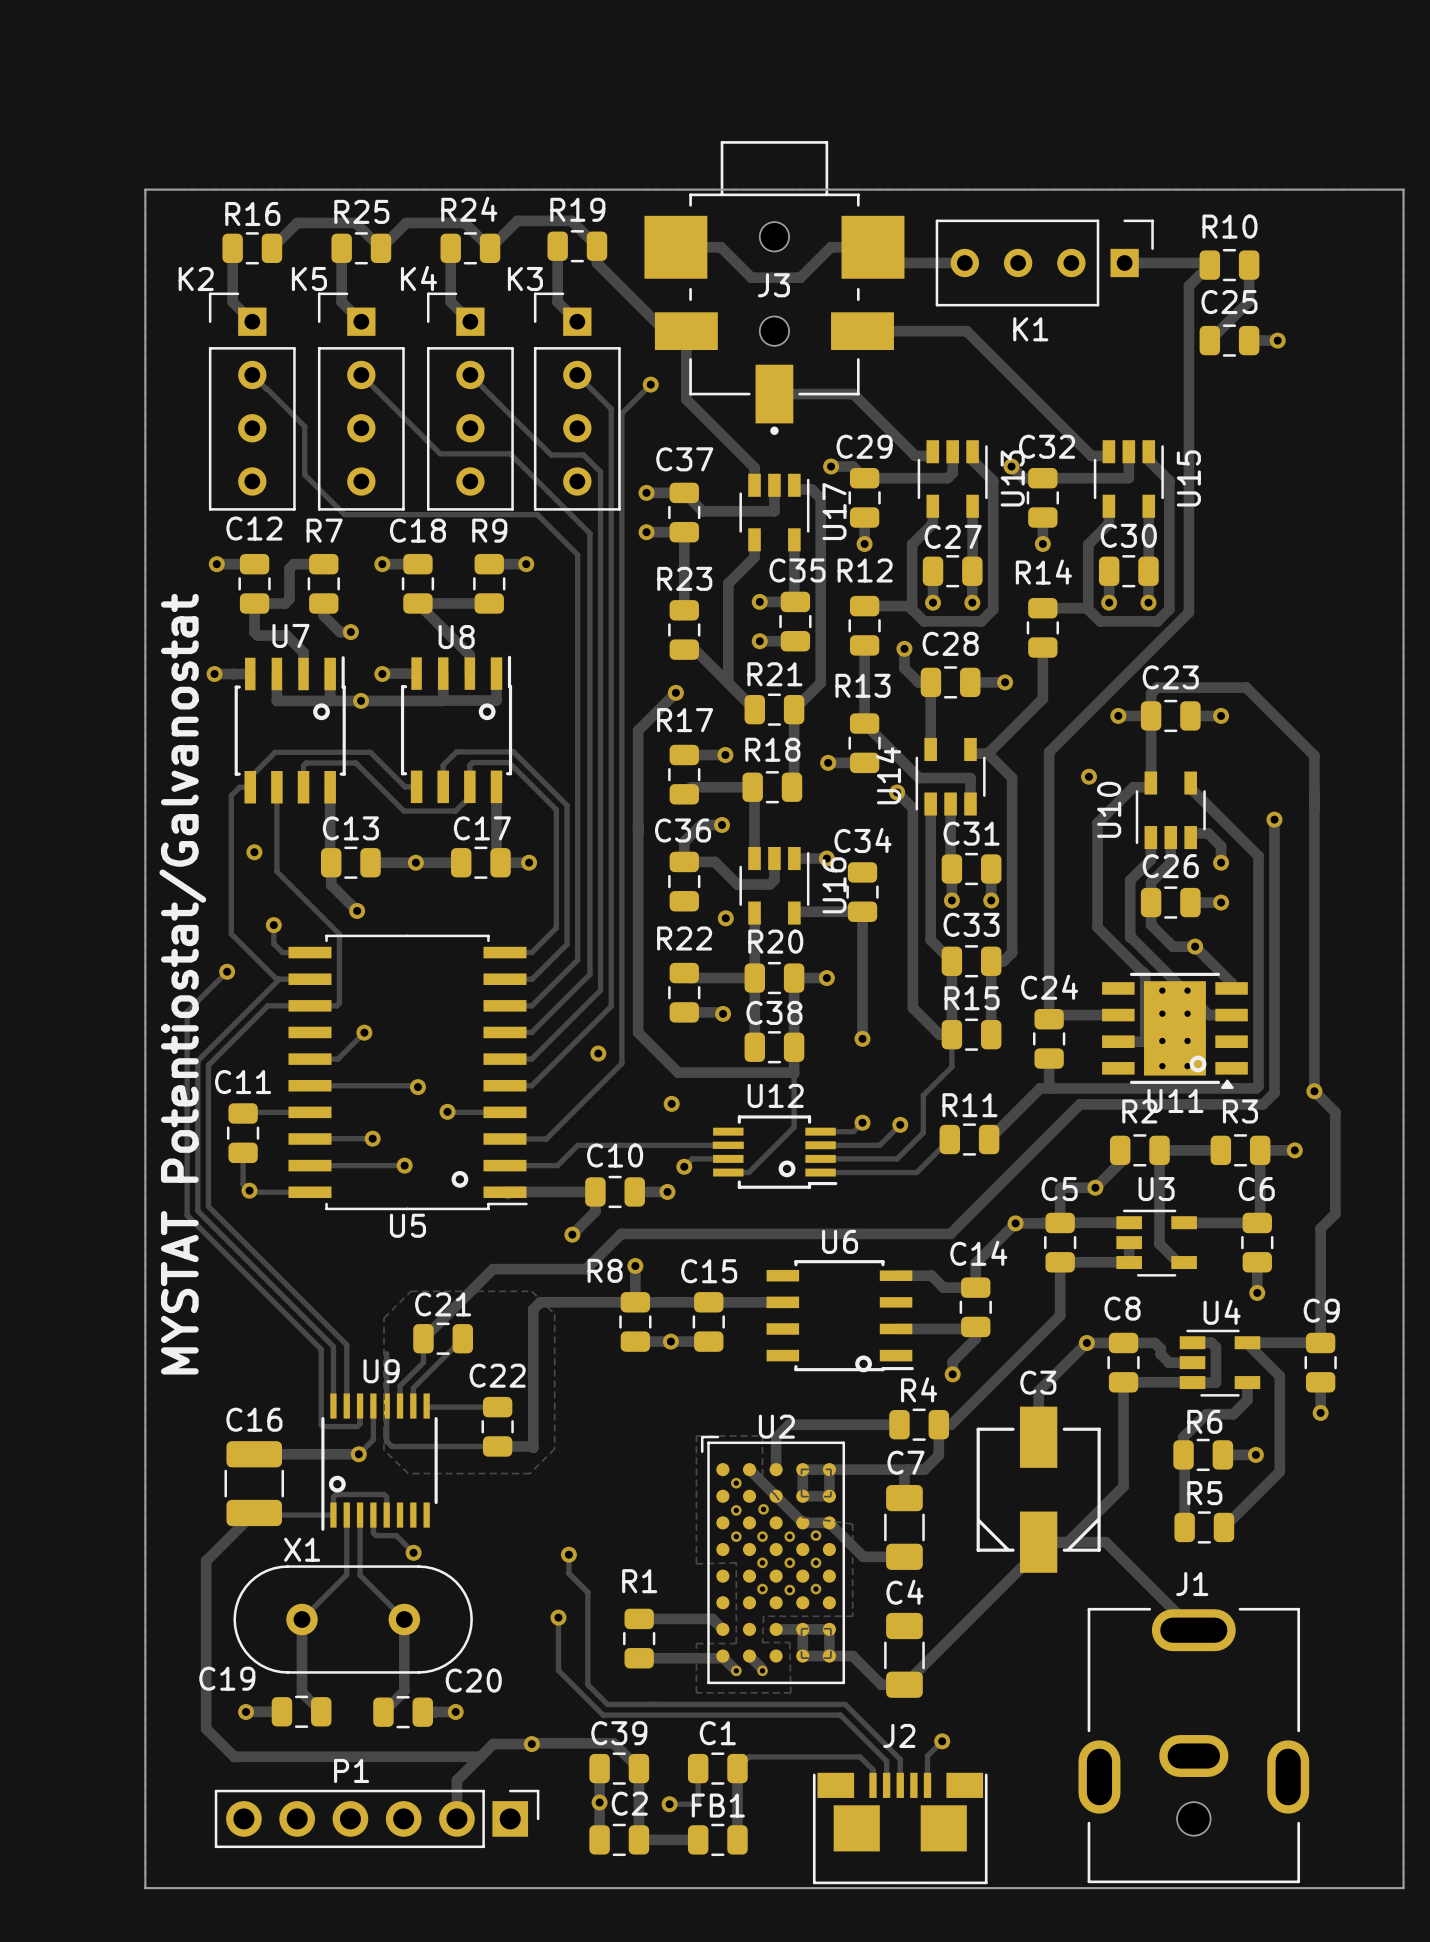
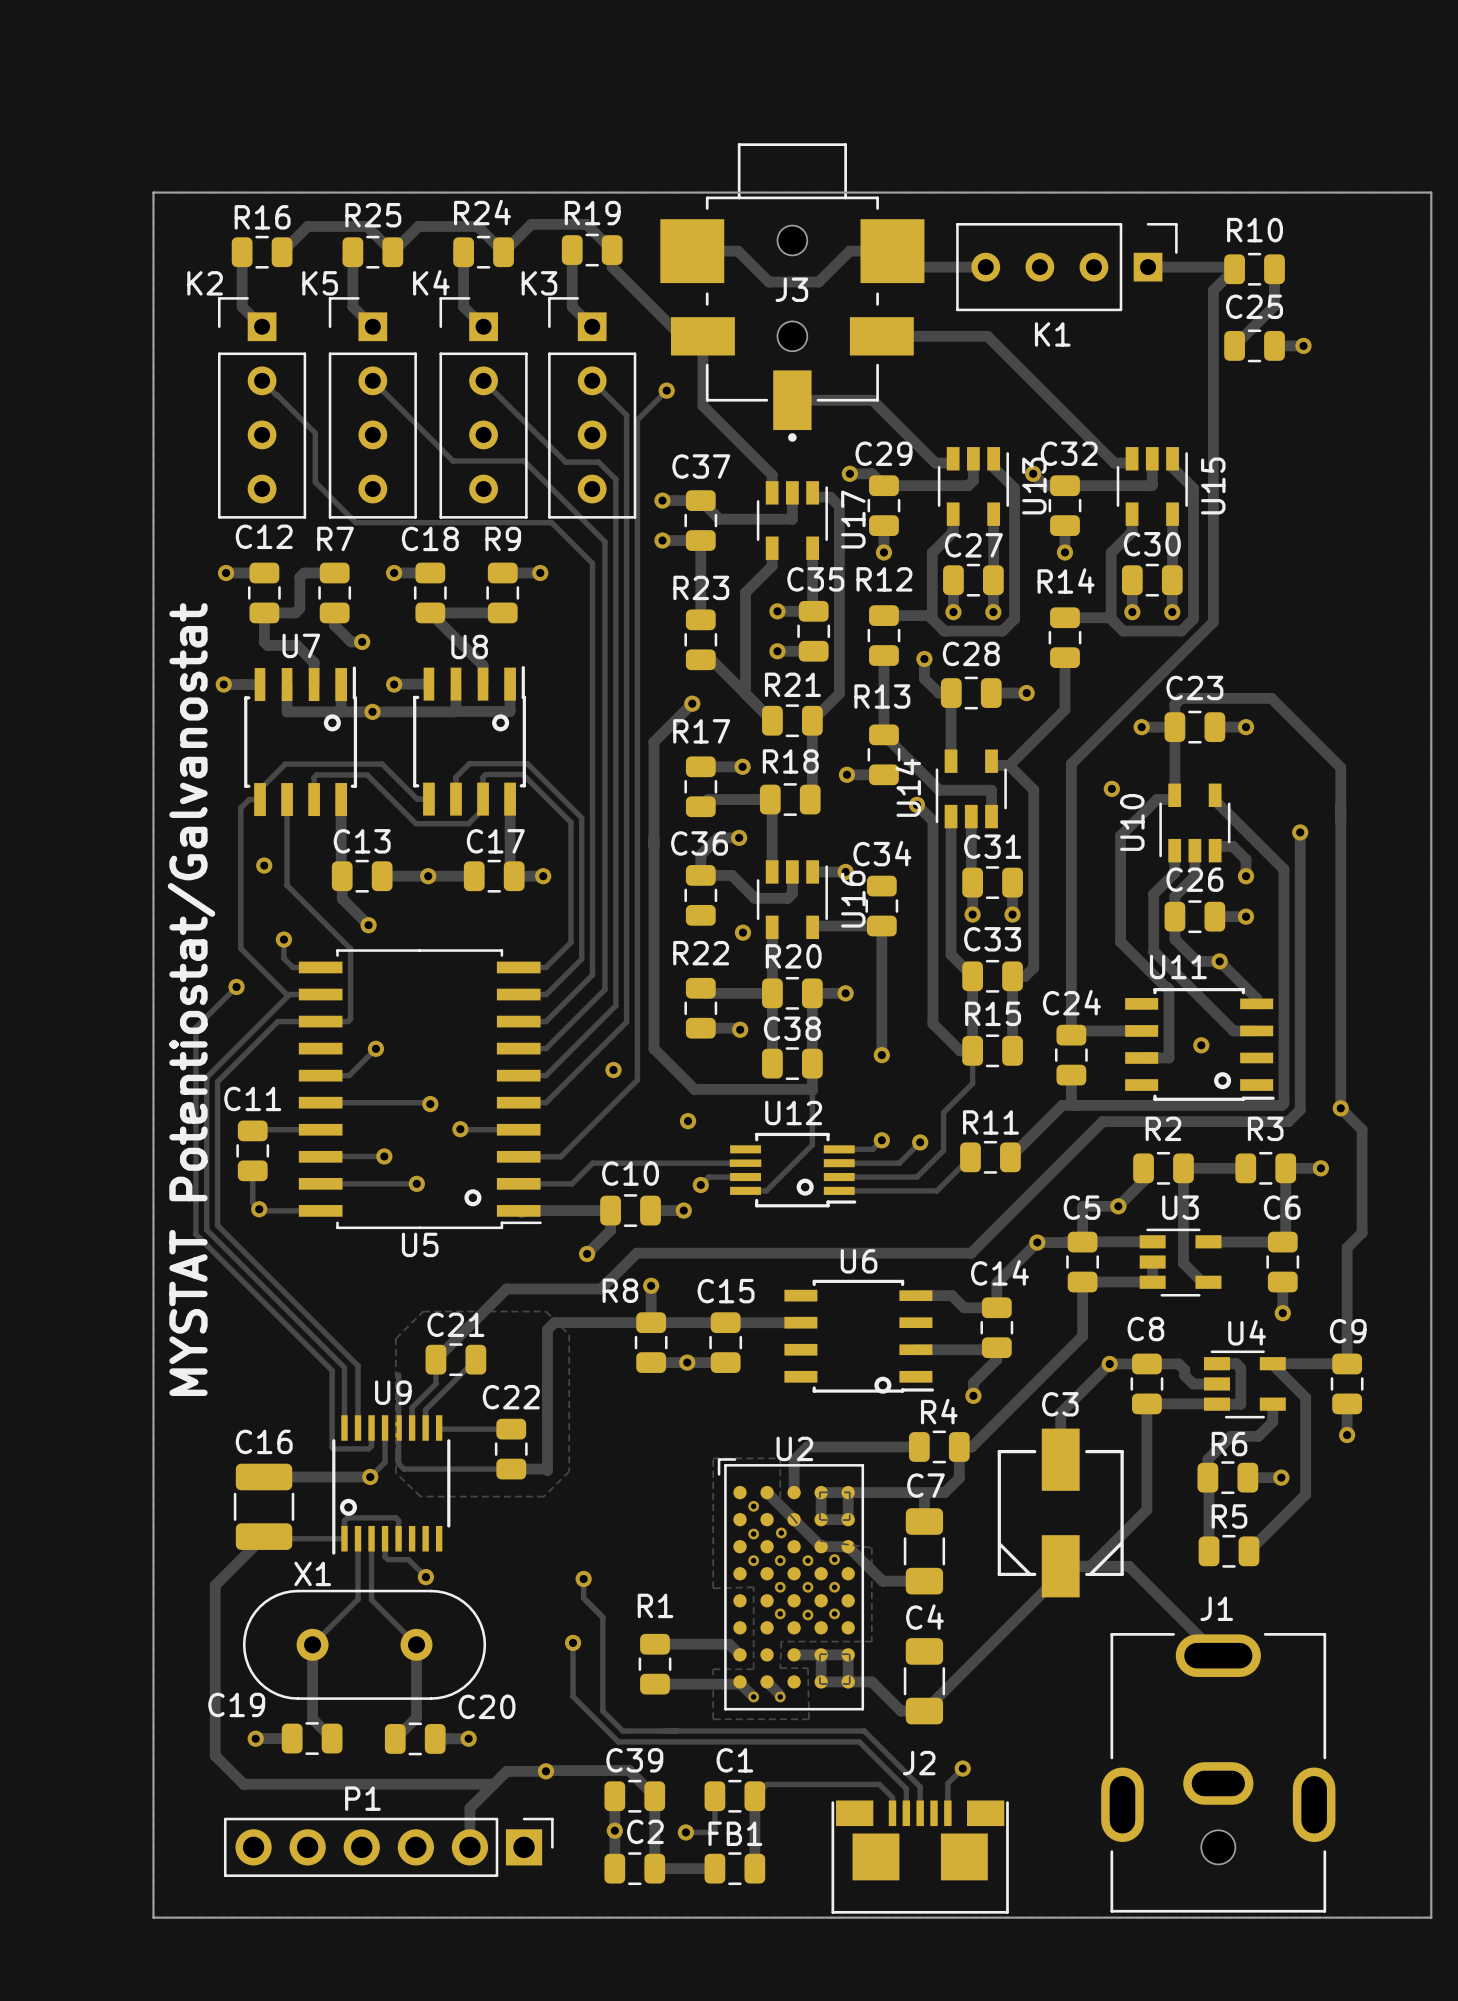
U11 footprint: [1102, 972, 1248, 1089] -> [1125, 988, 1275, 1101]
via: none -> (1201, 1045)
U11 name position: U11 (1175, 1100) -> U11 (1178, 966)

